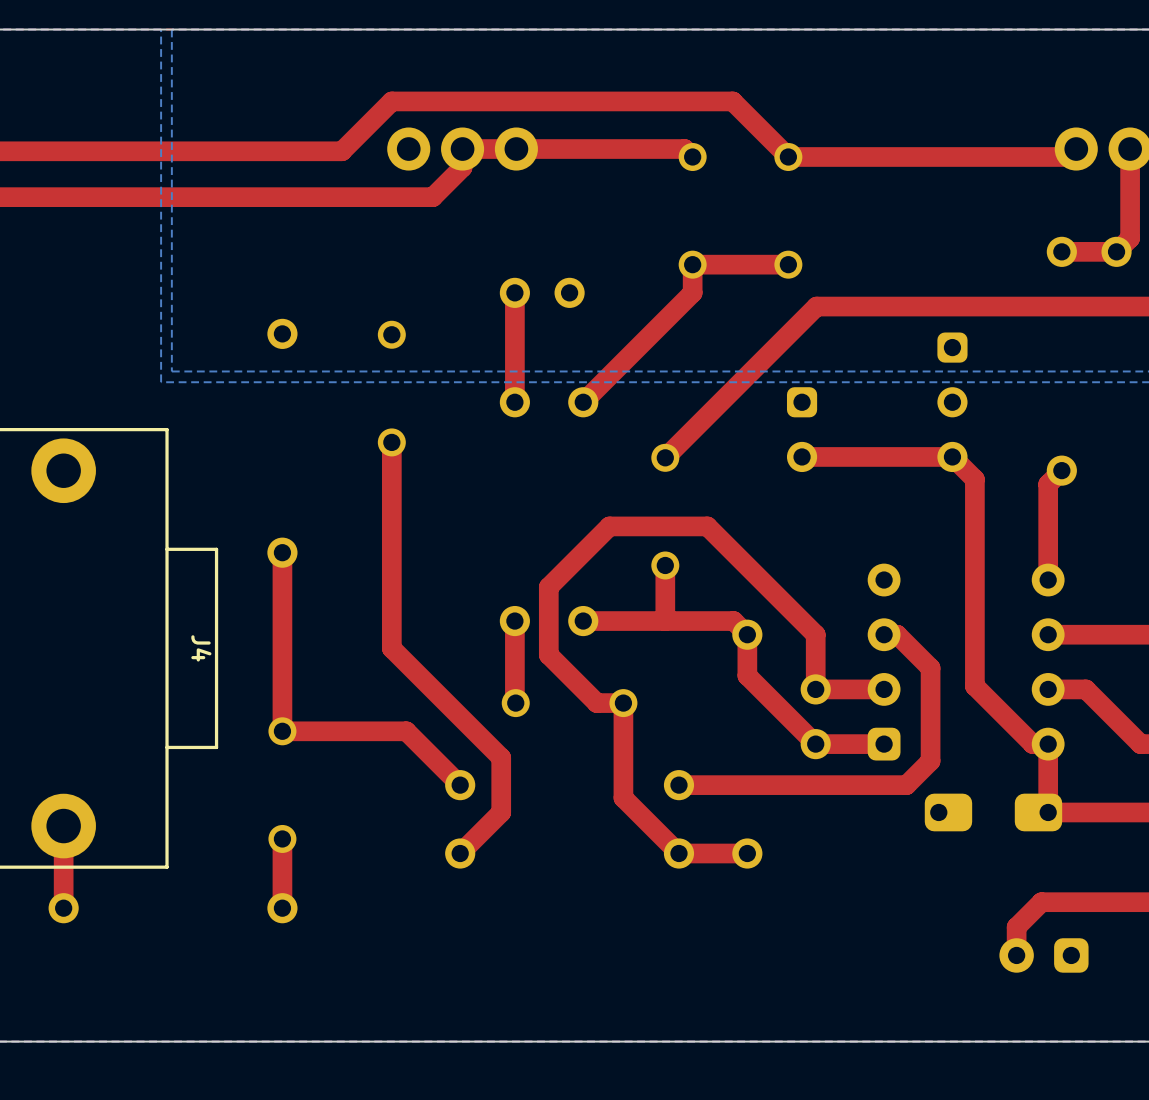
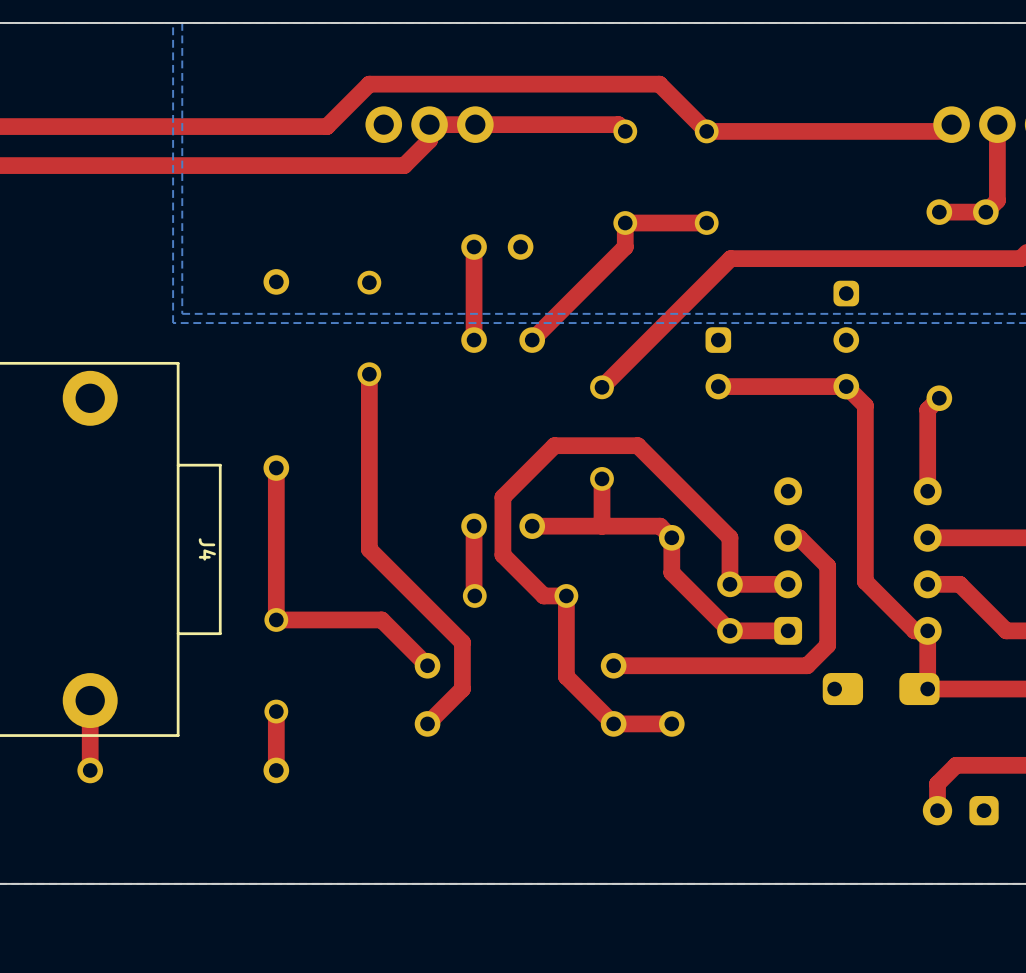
top track: (1081, 902) (1041, 902) (1016, 927) (1016, 955) -> (956, 765) (937, 783) (937, 810)
part position: (1043, 955) -> (960, 810)

